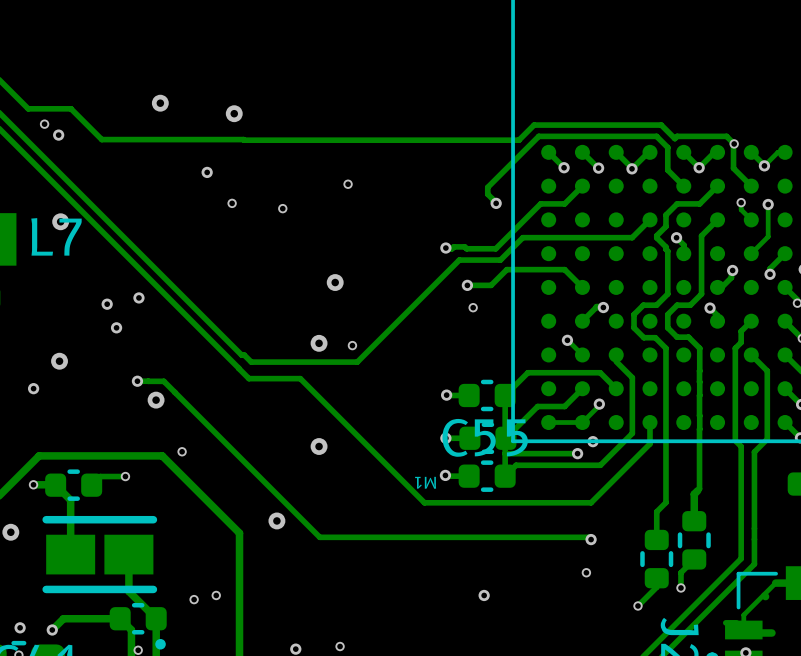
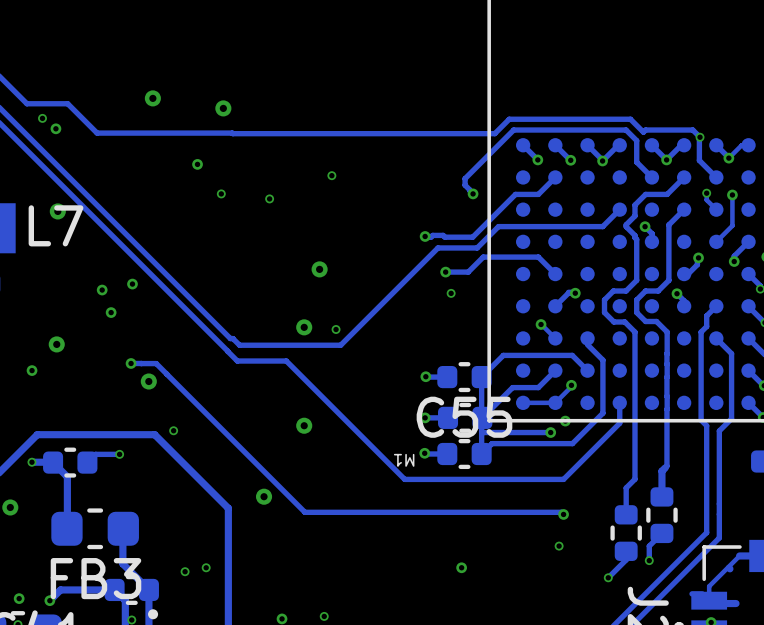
part: (99, 554) -> none
FB3: none -> (95, 528)

